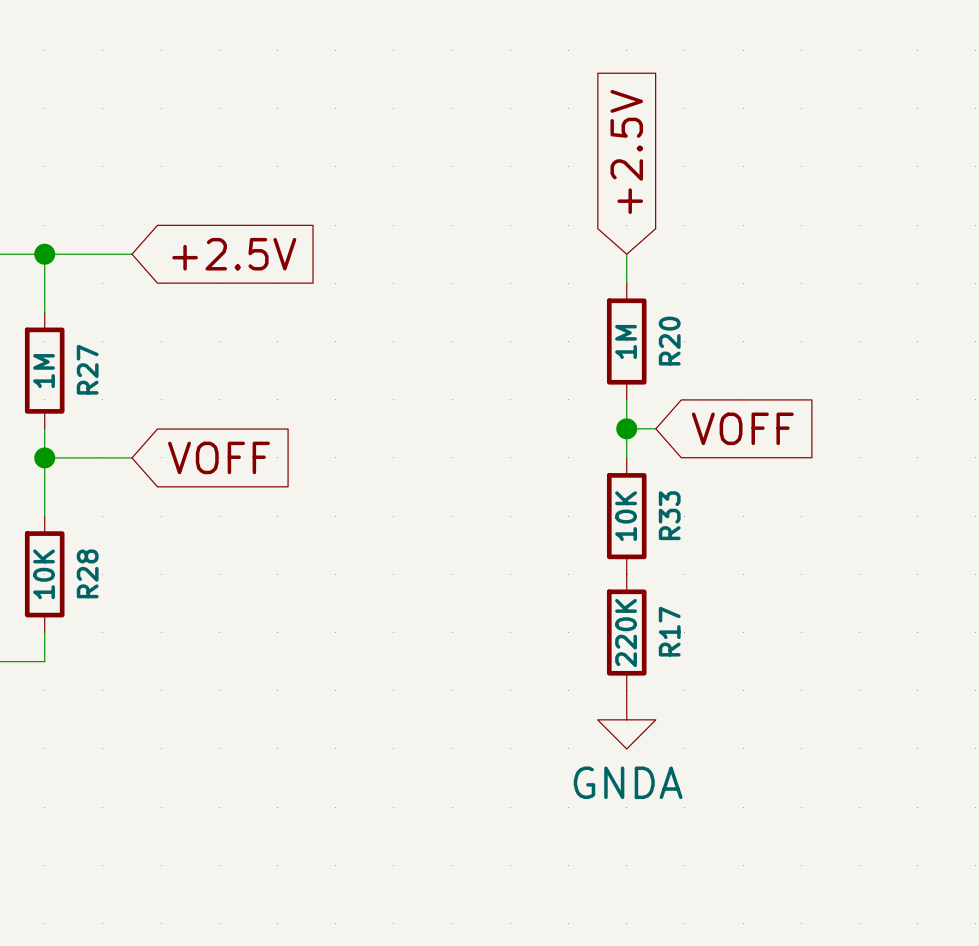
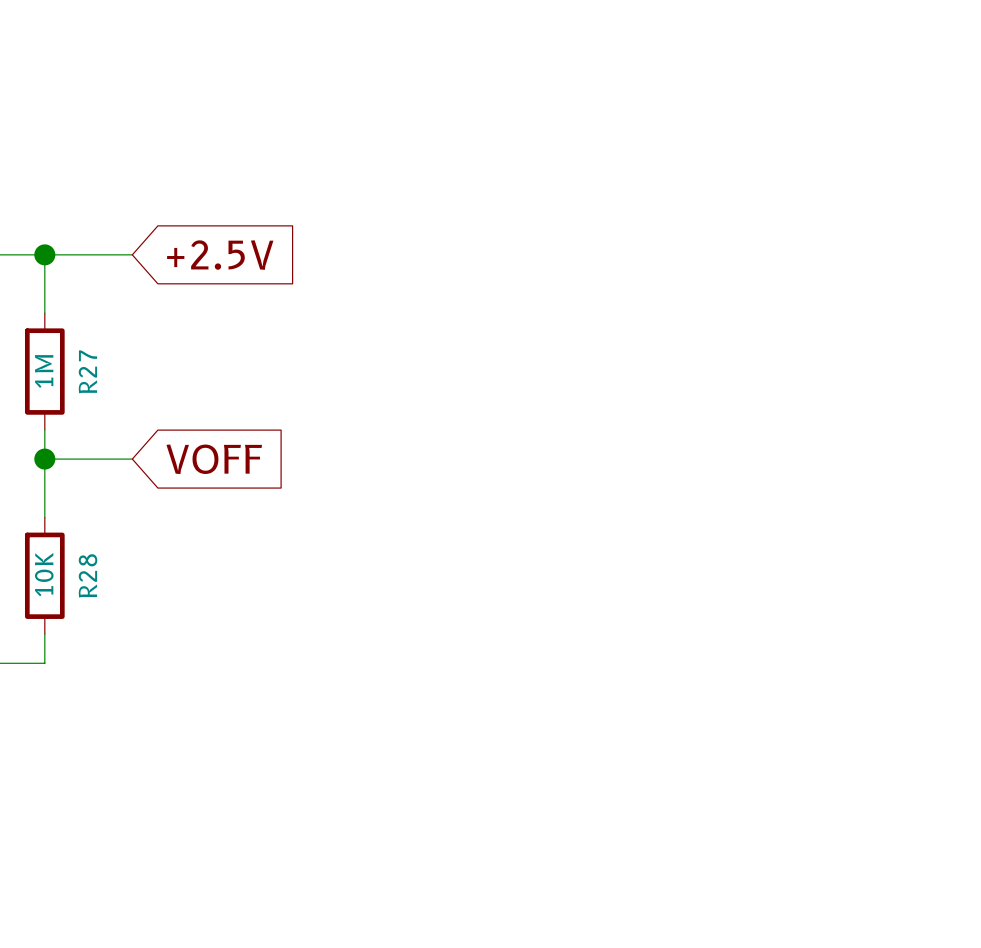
global label: +2.5V (626, 151) -> none
wire: (626, 254) (626, 283) -> none
R20: 1M (626, 341) -> none
wire: (626, 399) (626, 457) -> none
wire: (626, 428) (655, 428) -> none
junction: (626, 428) -> none
global label: VOFF (742, 428) -> none
R33: 10K (626, 516) -> none
R17: 220K (626, 632) -> none
power symbol: GNDA (626, 719) -> none

